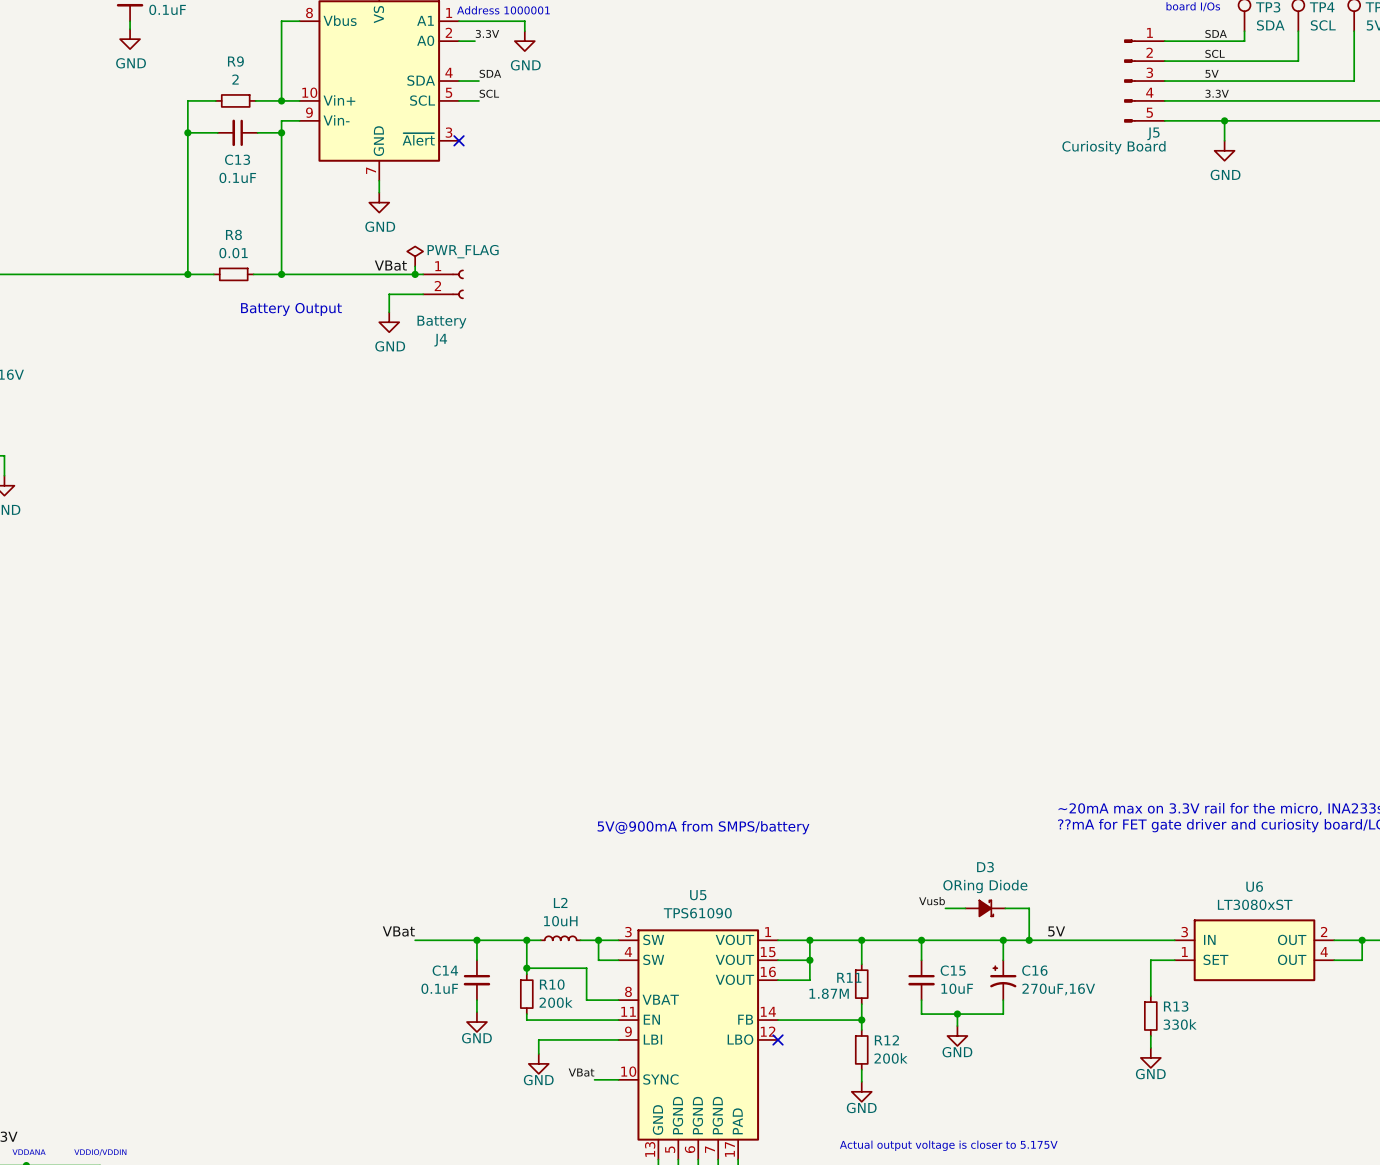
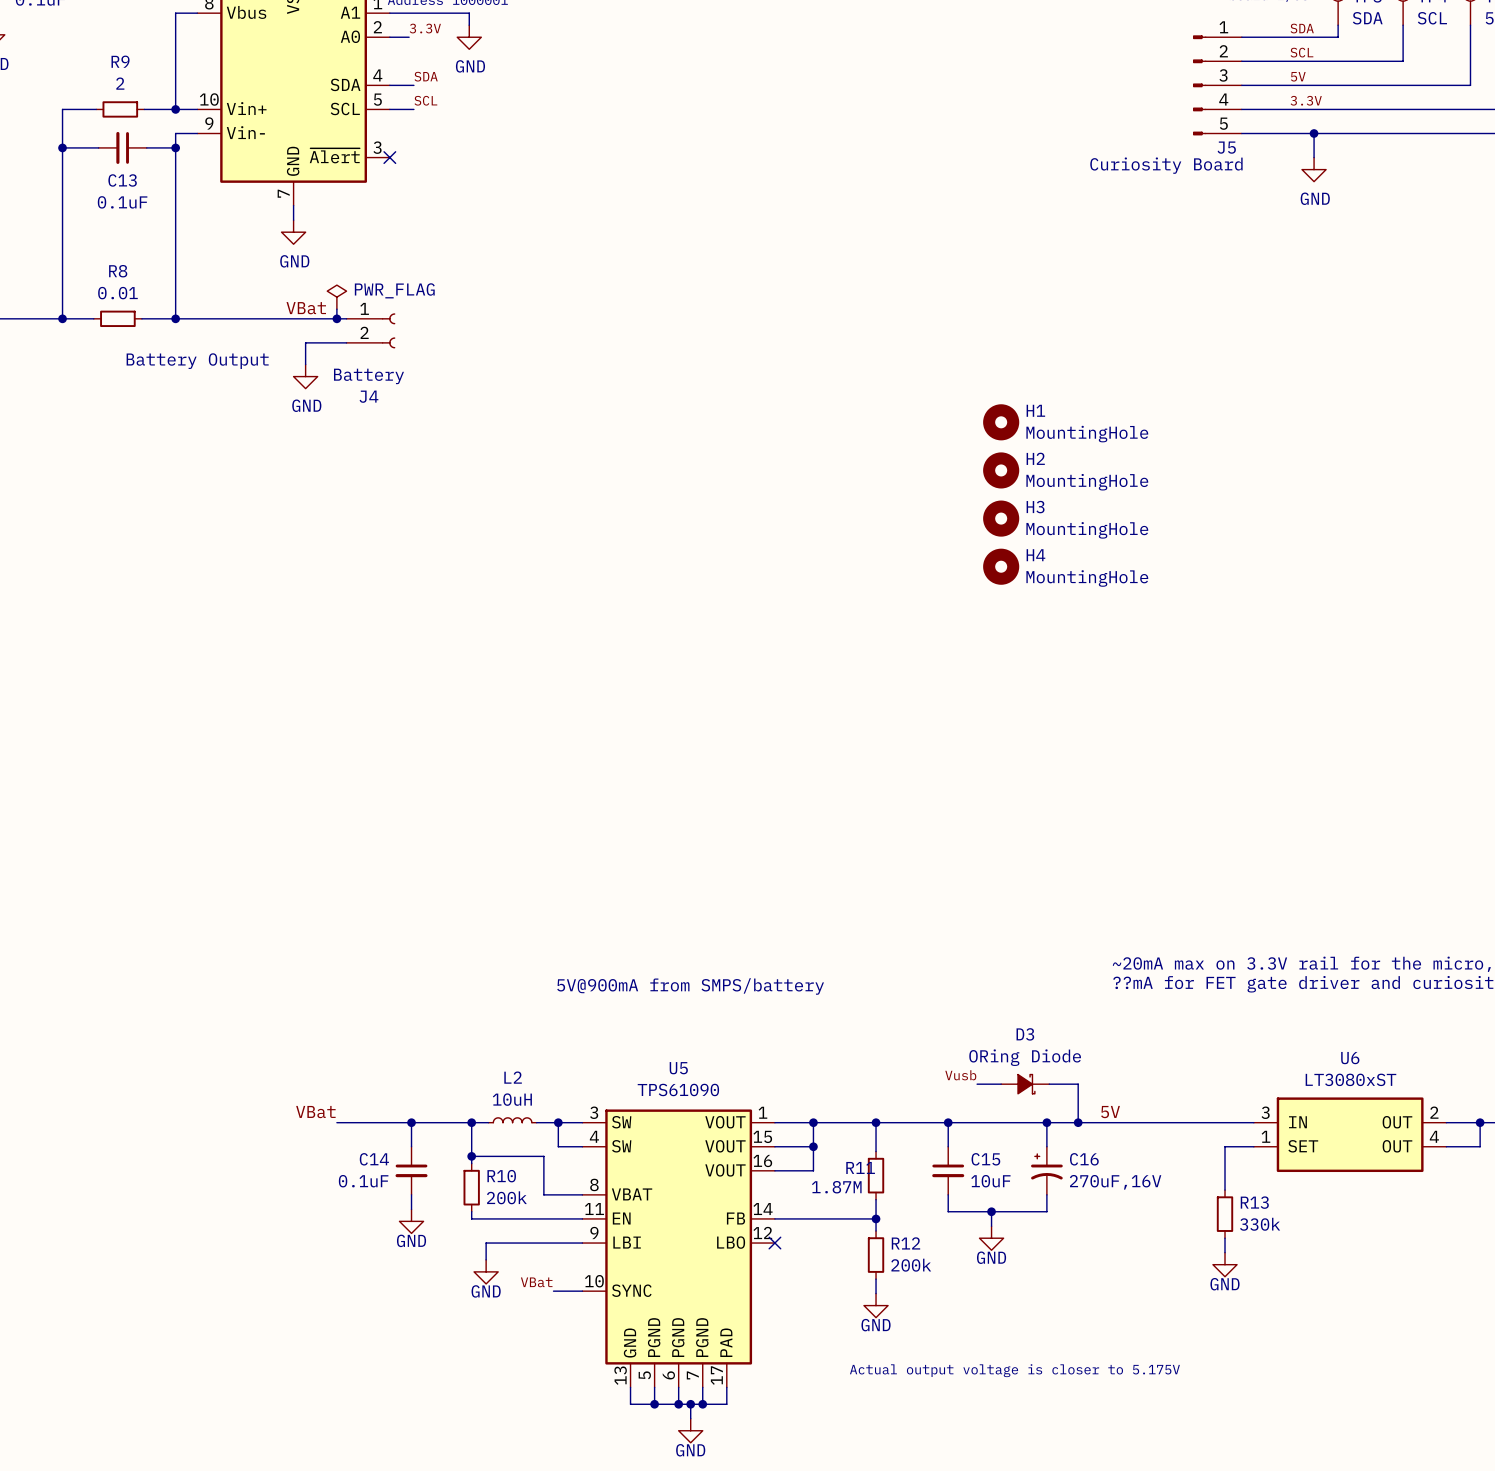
H1: none -> MountingHole (1001, 422)
H2: none -> MountingHole (1001, 470)
H3: none -> MountingHole (1001, 518)
H4: none -> MountingHole (1001, 566)

